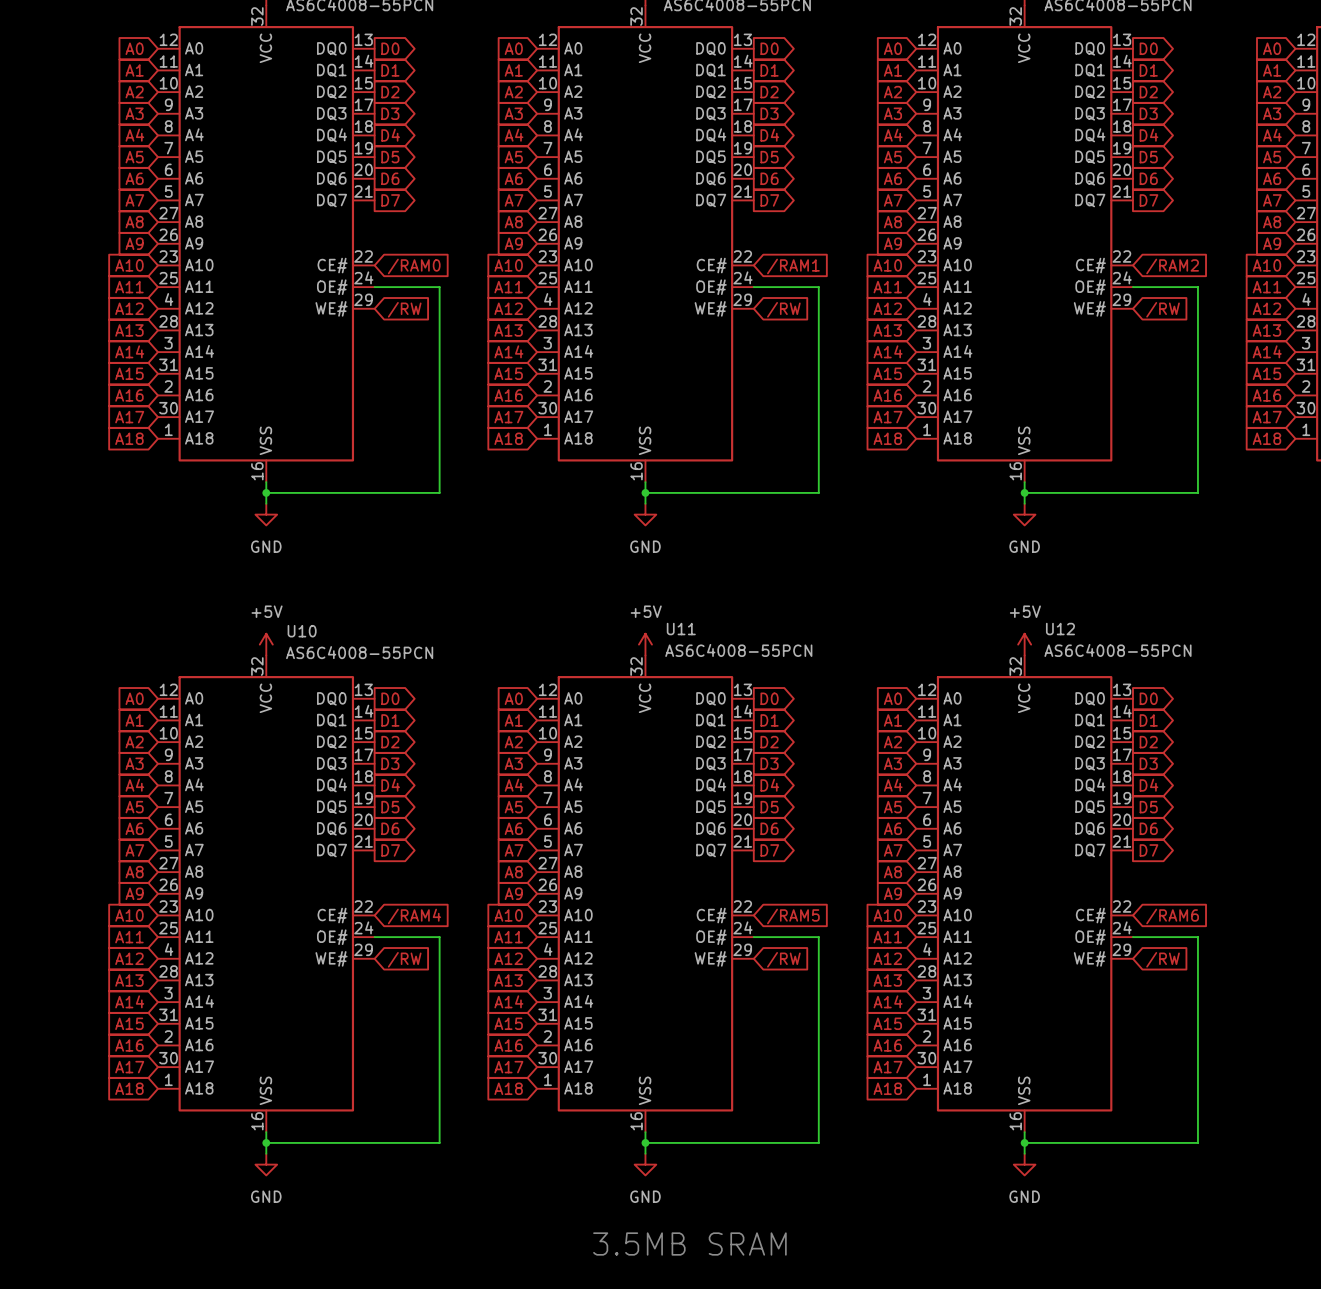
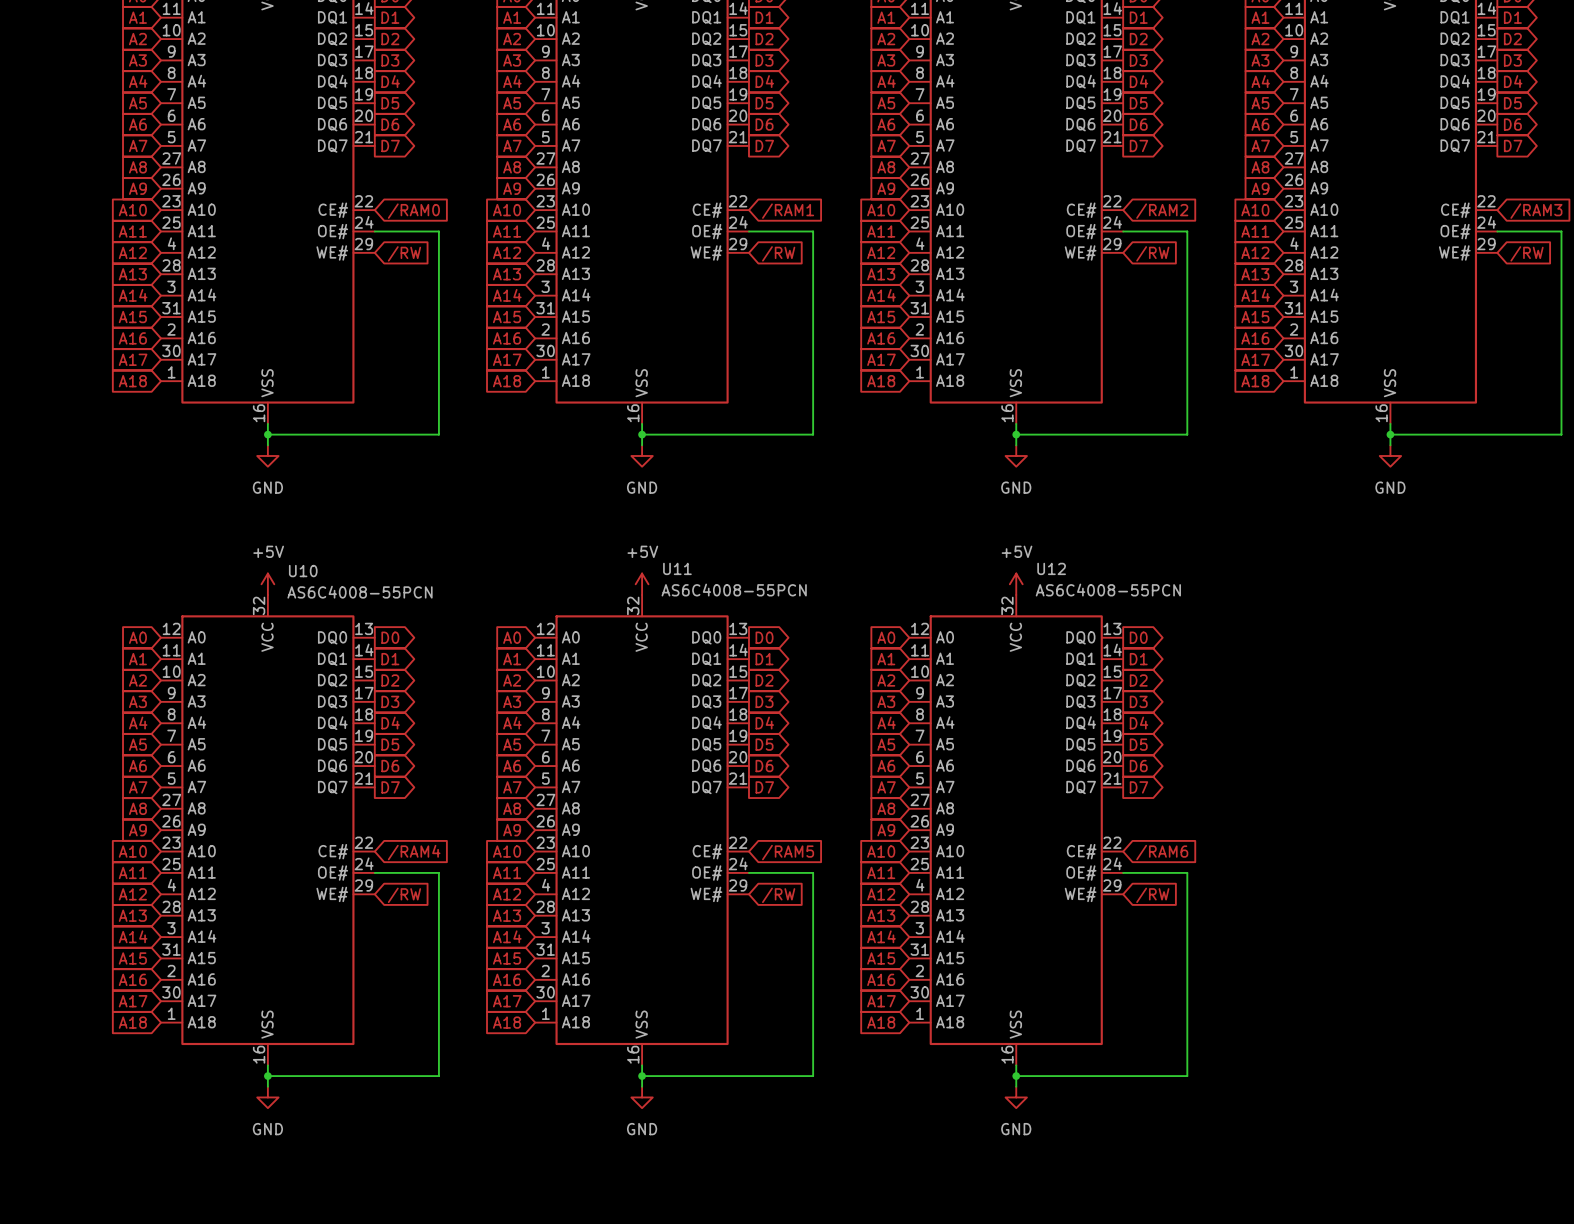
text: 3.5MB SRAM (689, 1244) -> none

